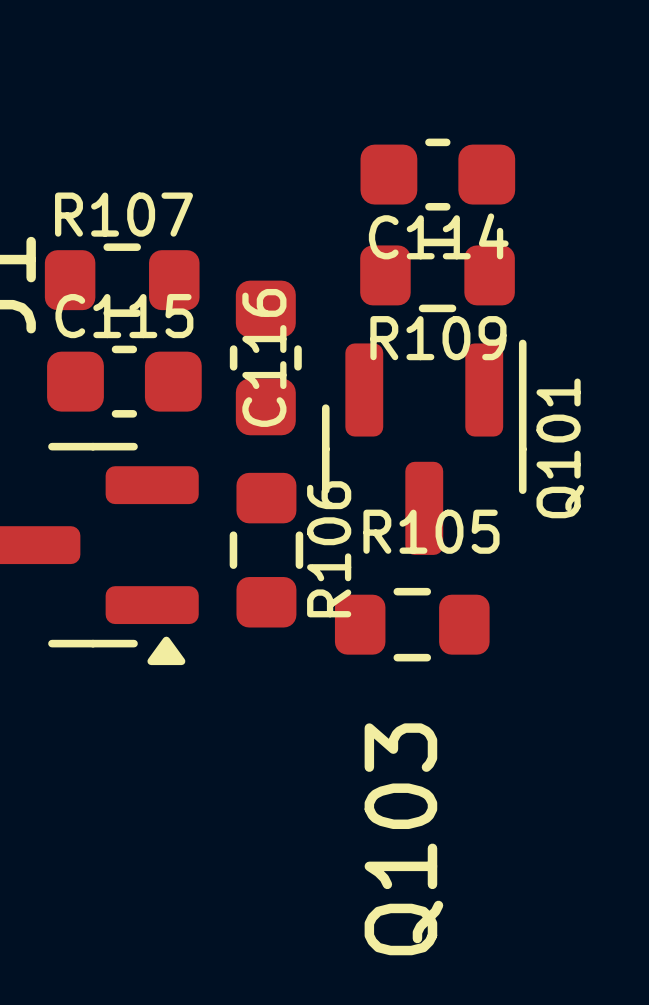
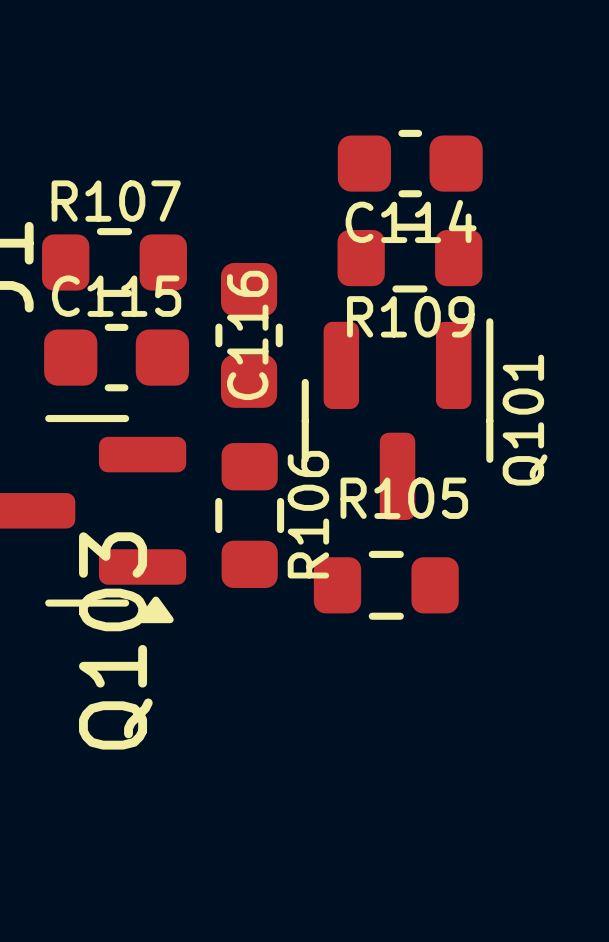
Q103 name position: Q103 (403, 839) -> Q103 (115, 640)

